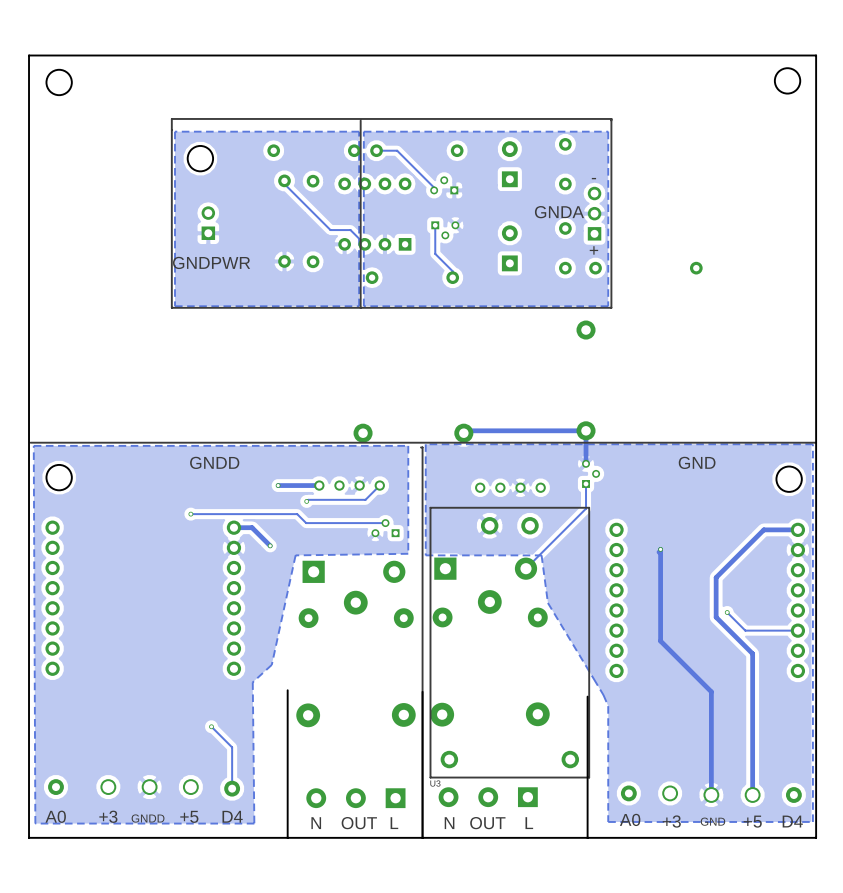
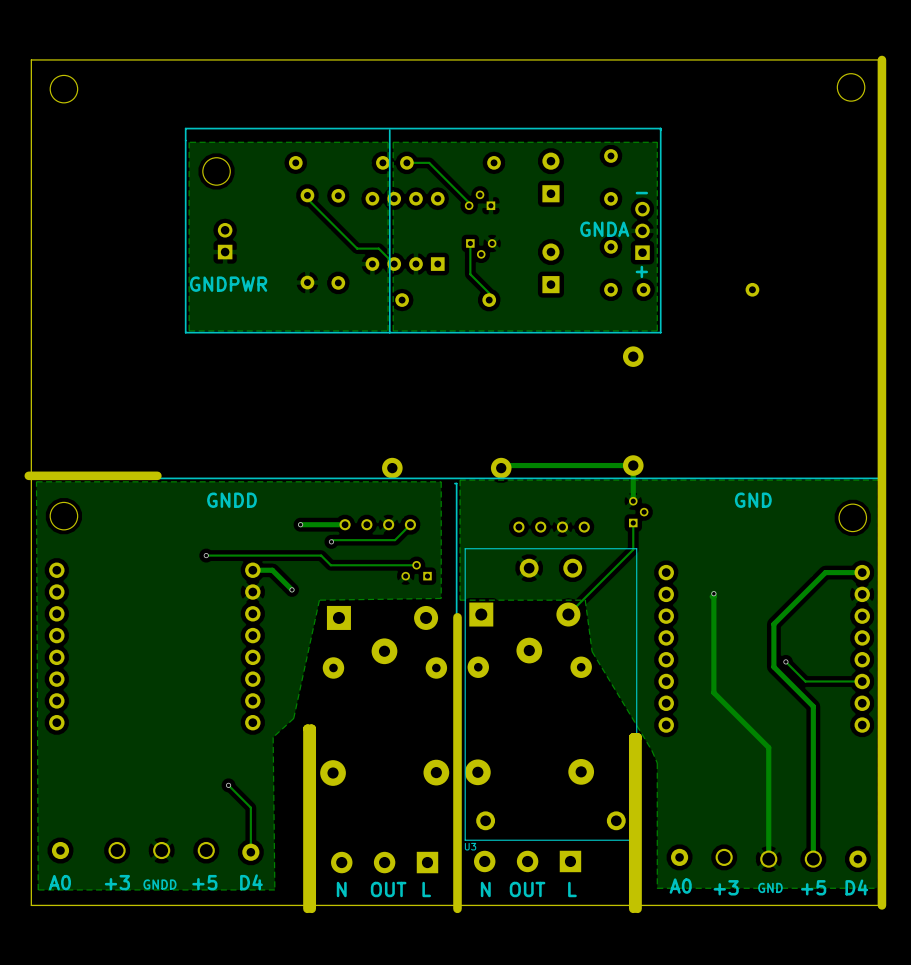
board edge width: thin (816, 55) (816, 837) -> thick (881, 59) (881, 905)
board edge: none -> (157, 475) (28, 475)
board edge: none -> (457, 617) (457, 908)
board edge: none -> (311, 908) (311, 728) (307, 728) (307, 908)
board edge: none -> (637, 908) (637, 737) (633, 737) (633, 908)

